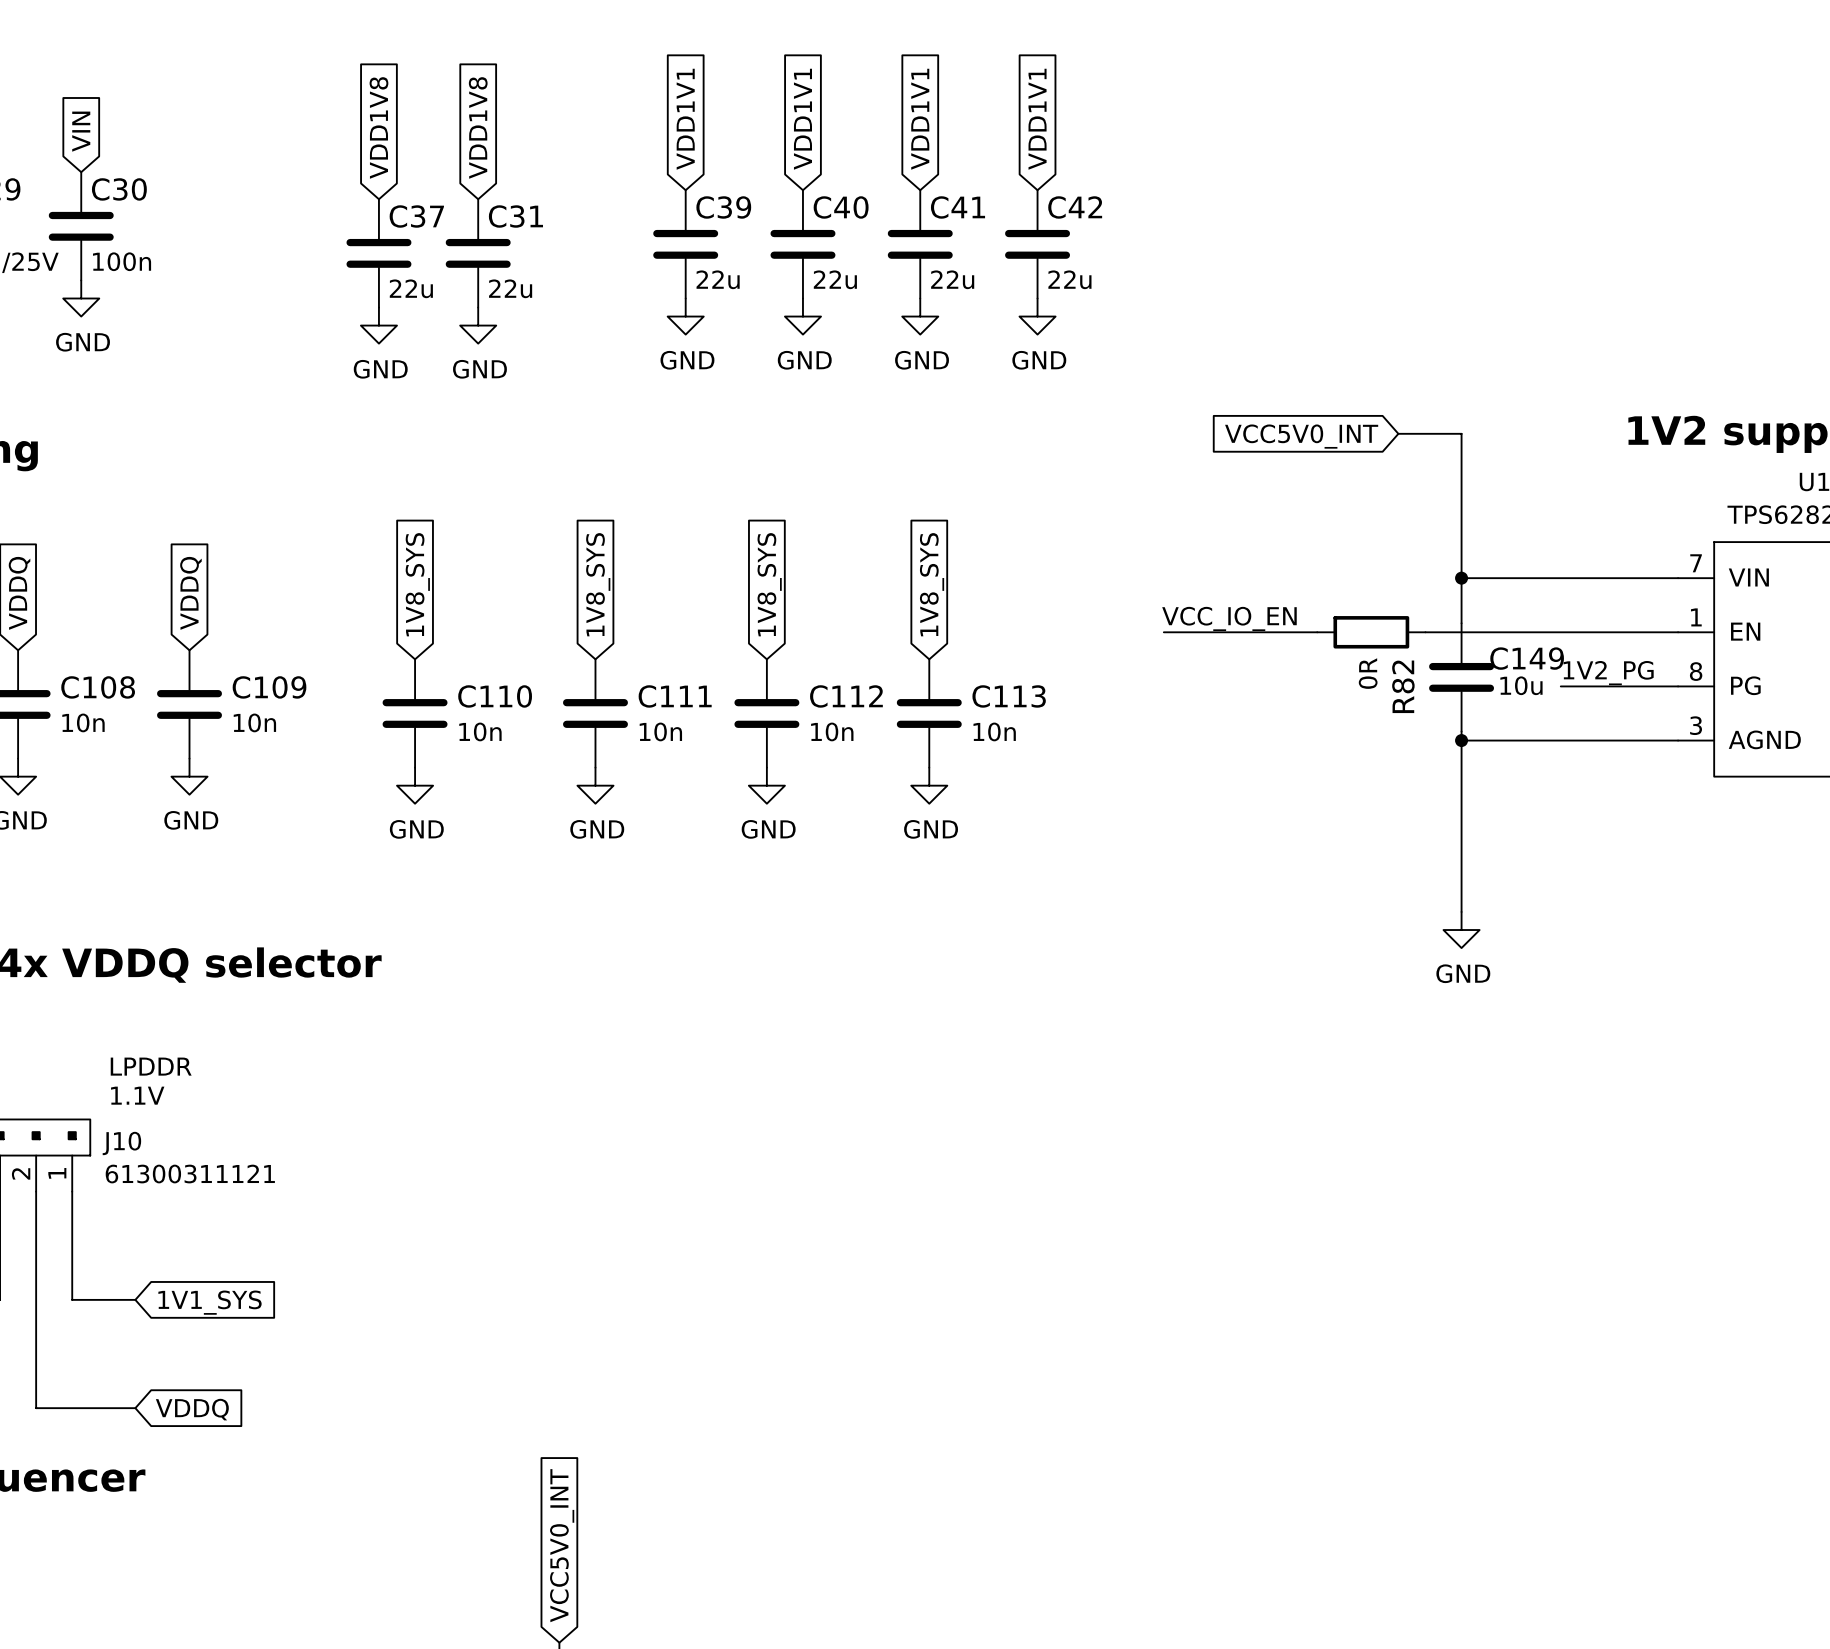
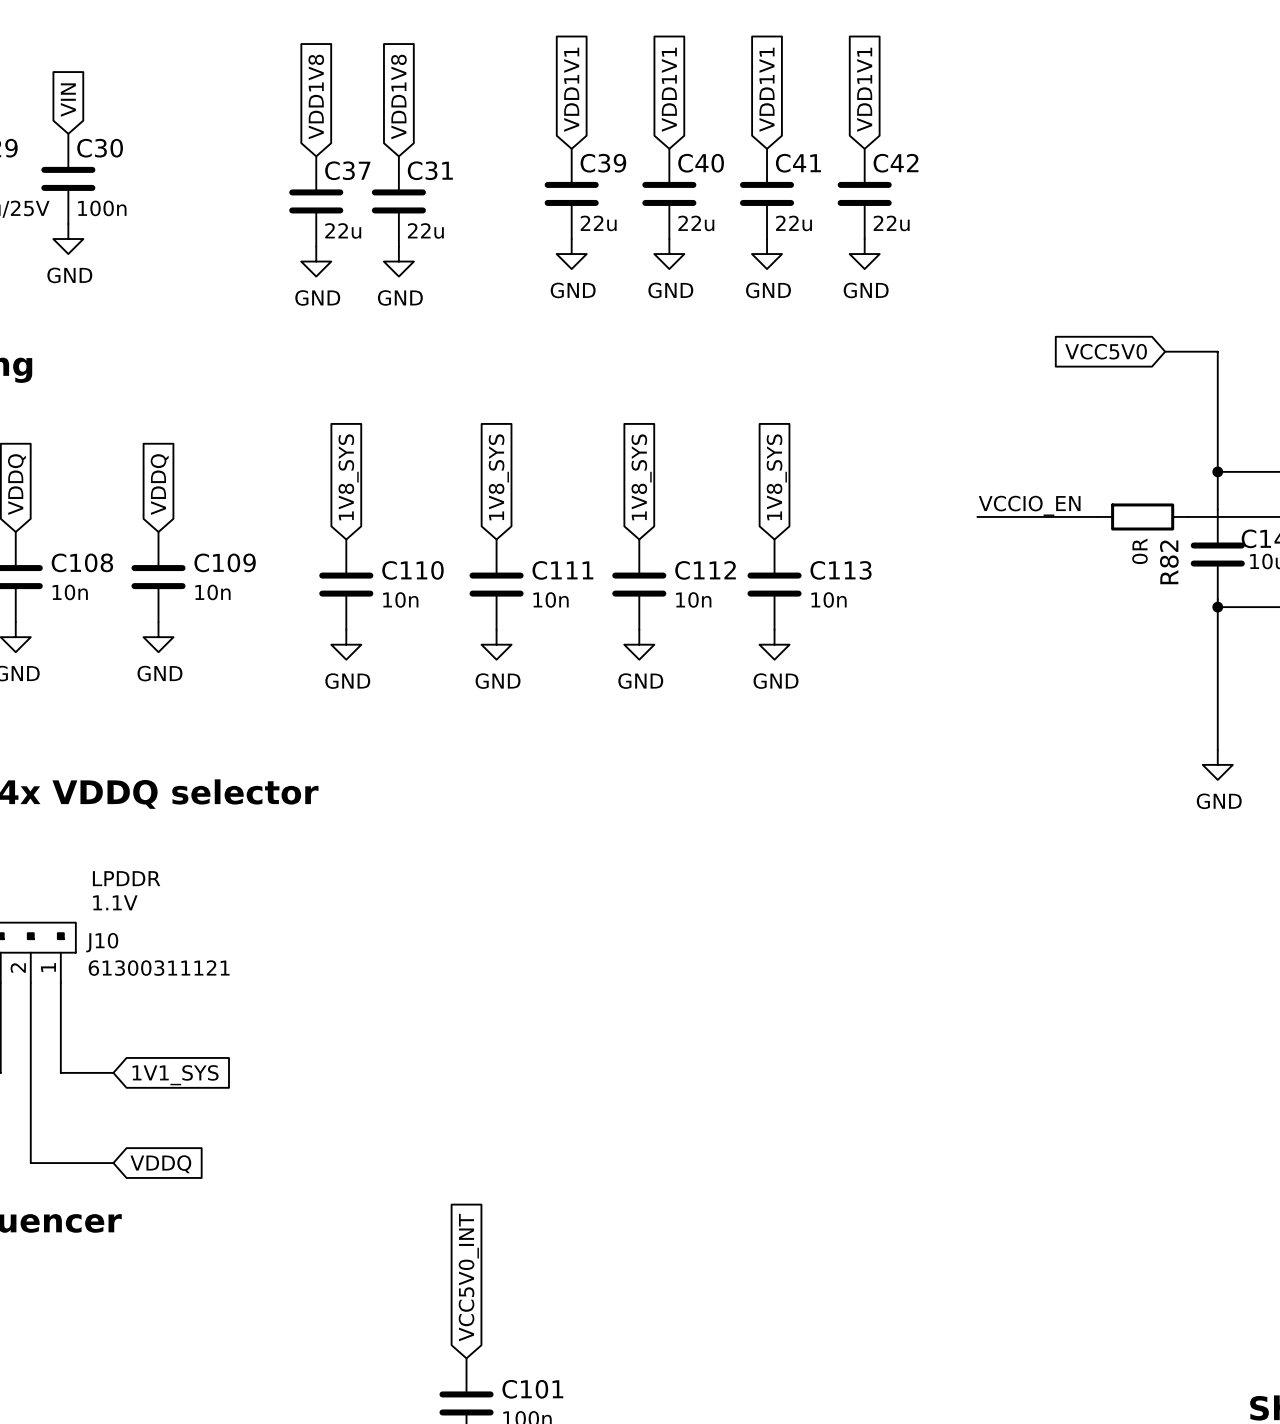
global label: VCC5V0_INT (1301, 436) -> VCC5V0 (1106, 351)
label: VCC_IO_EN (1229, 618) -> VCCIO_EN (1029, 505)
wire: (1163, 632) (1172, 632) -> none

